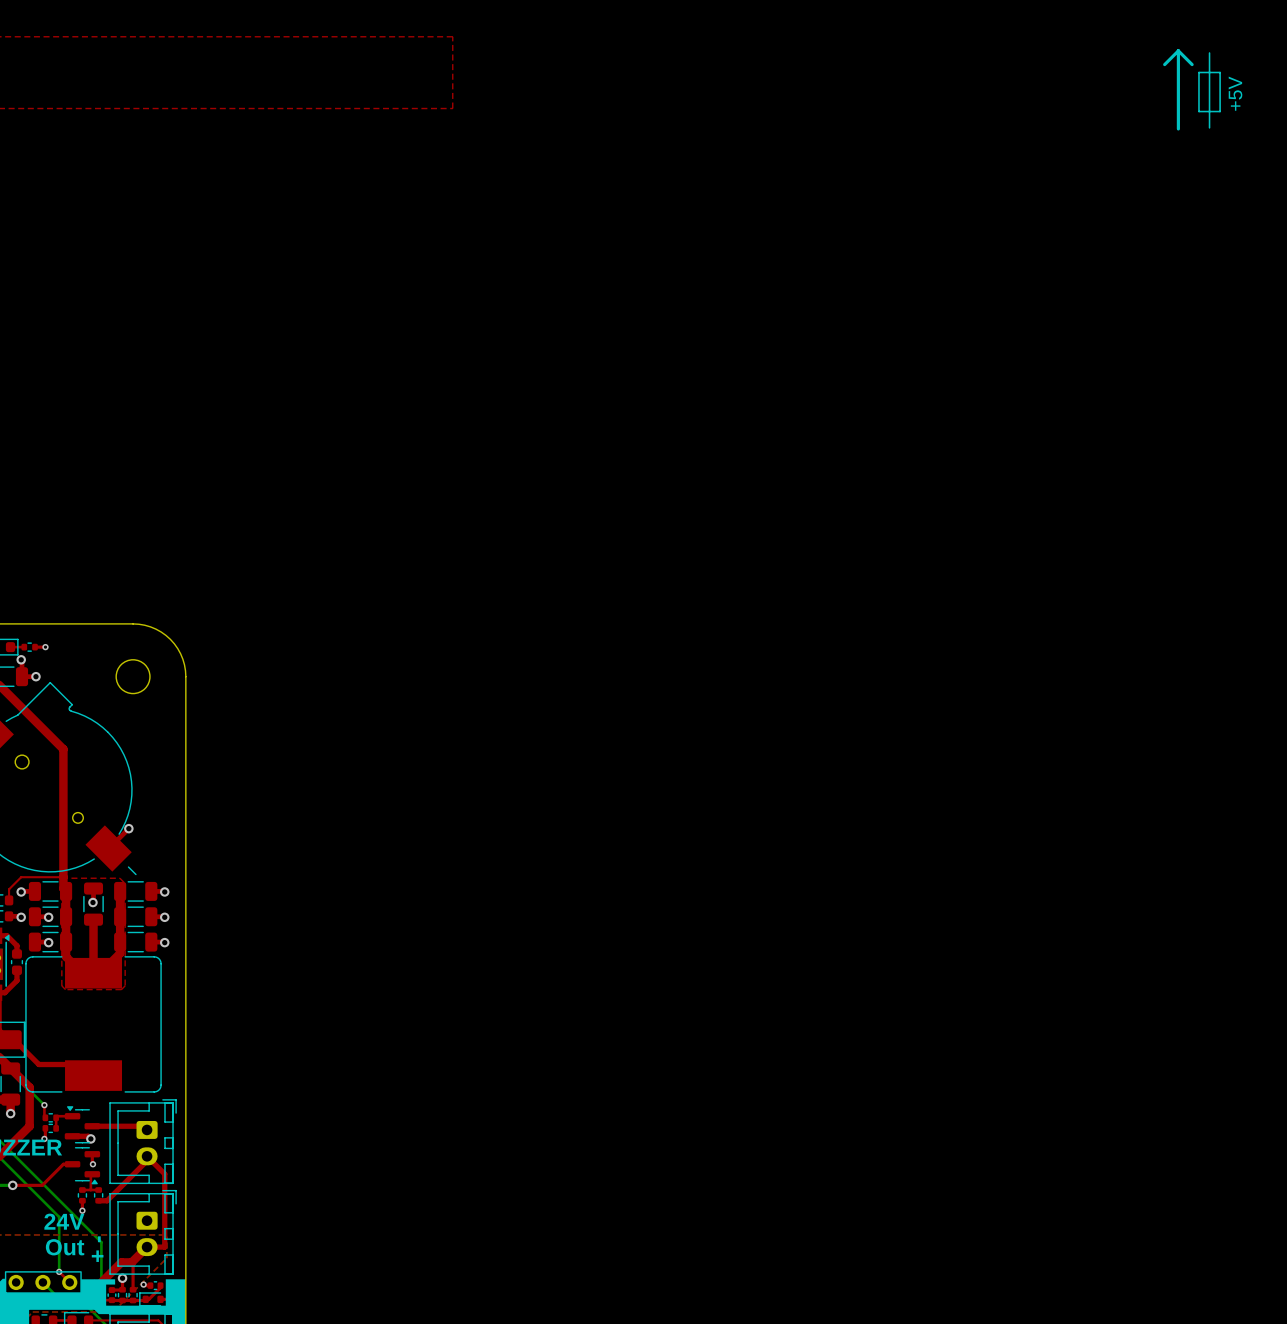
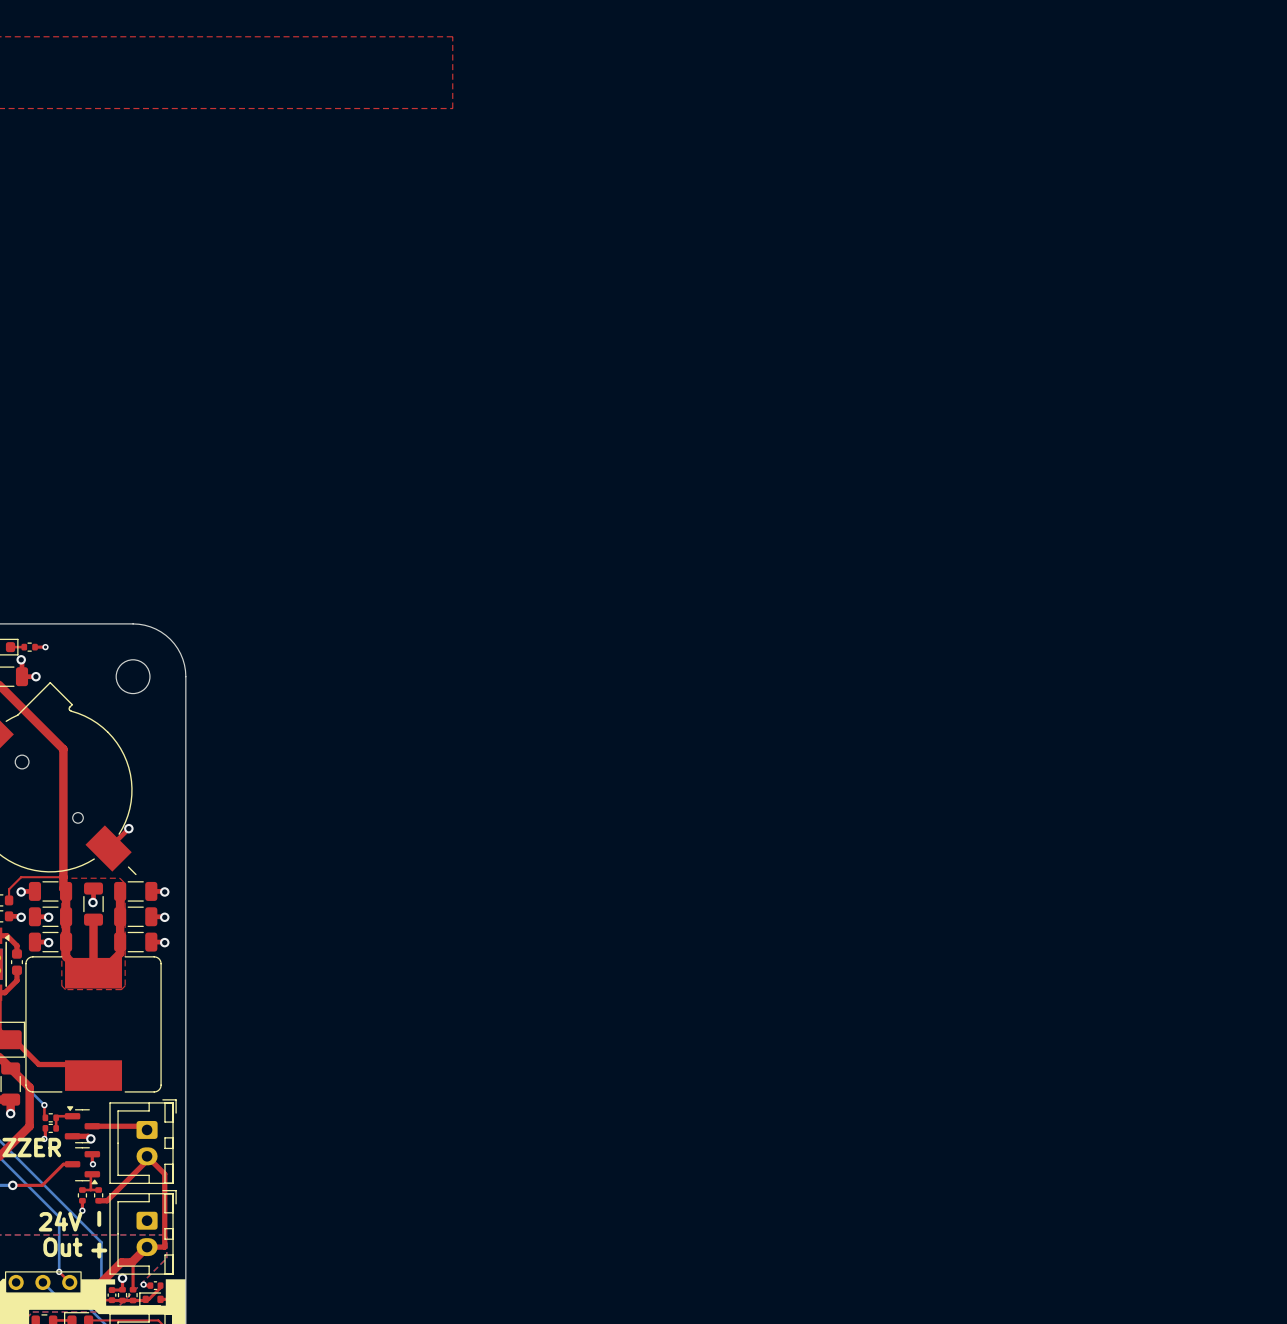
line: (1178, 50) (1178, 128) -> none
line: (1178, 50) (1164, 64) -> none
line: (1178, 50) (1192, 64) -> none
line: (1209, 52) (1209, 127) -> none
line: (1198, 72) (1220, 72) (1220, 111) (1198, 111) (1198, 72) -> none
text: +5V (1235, 93) -> none

